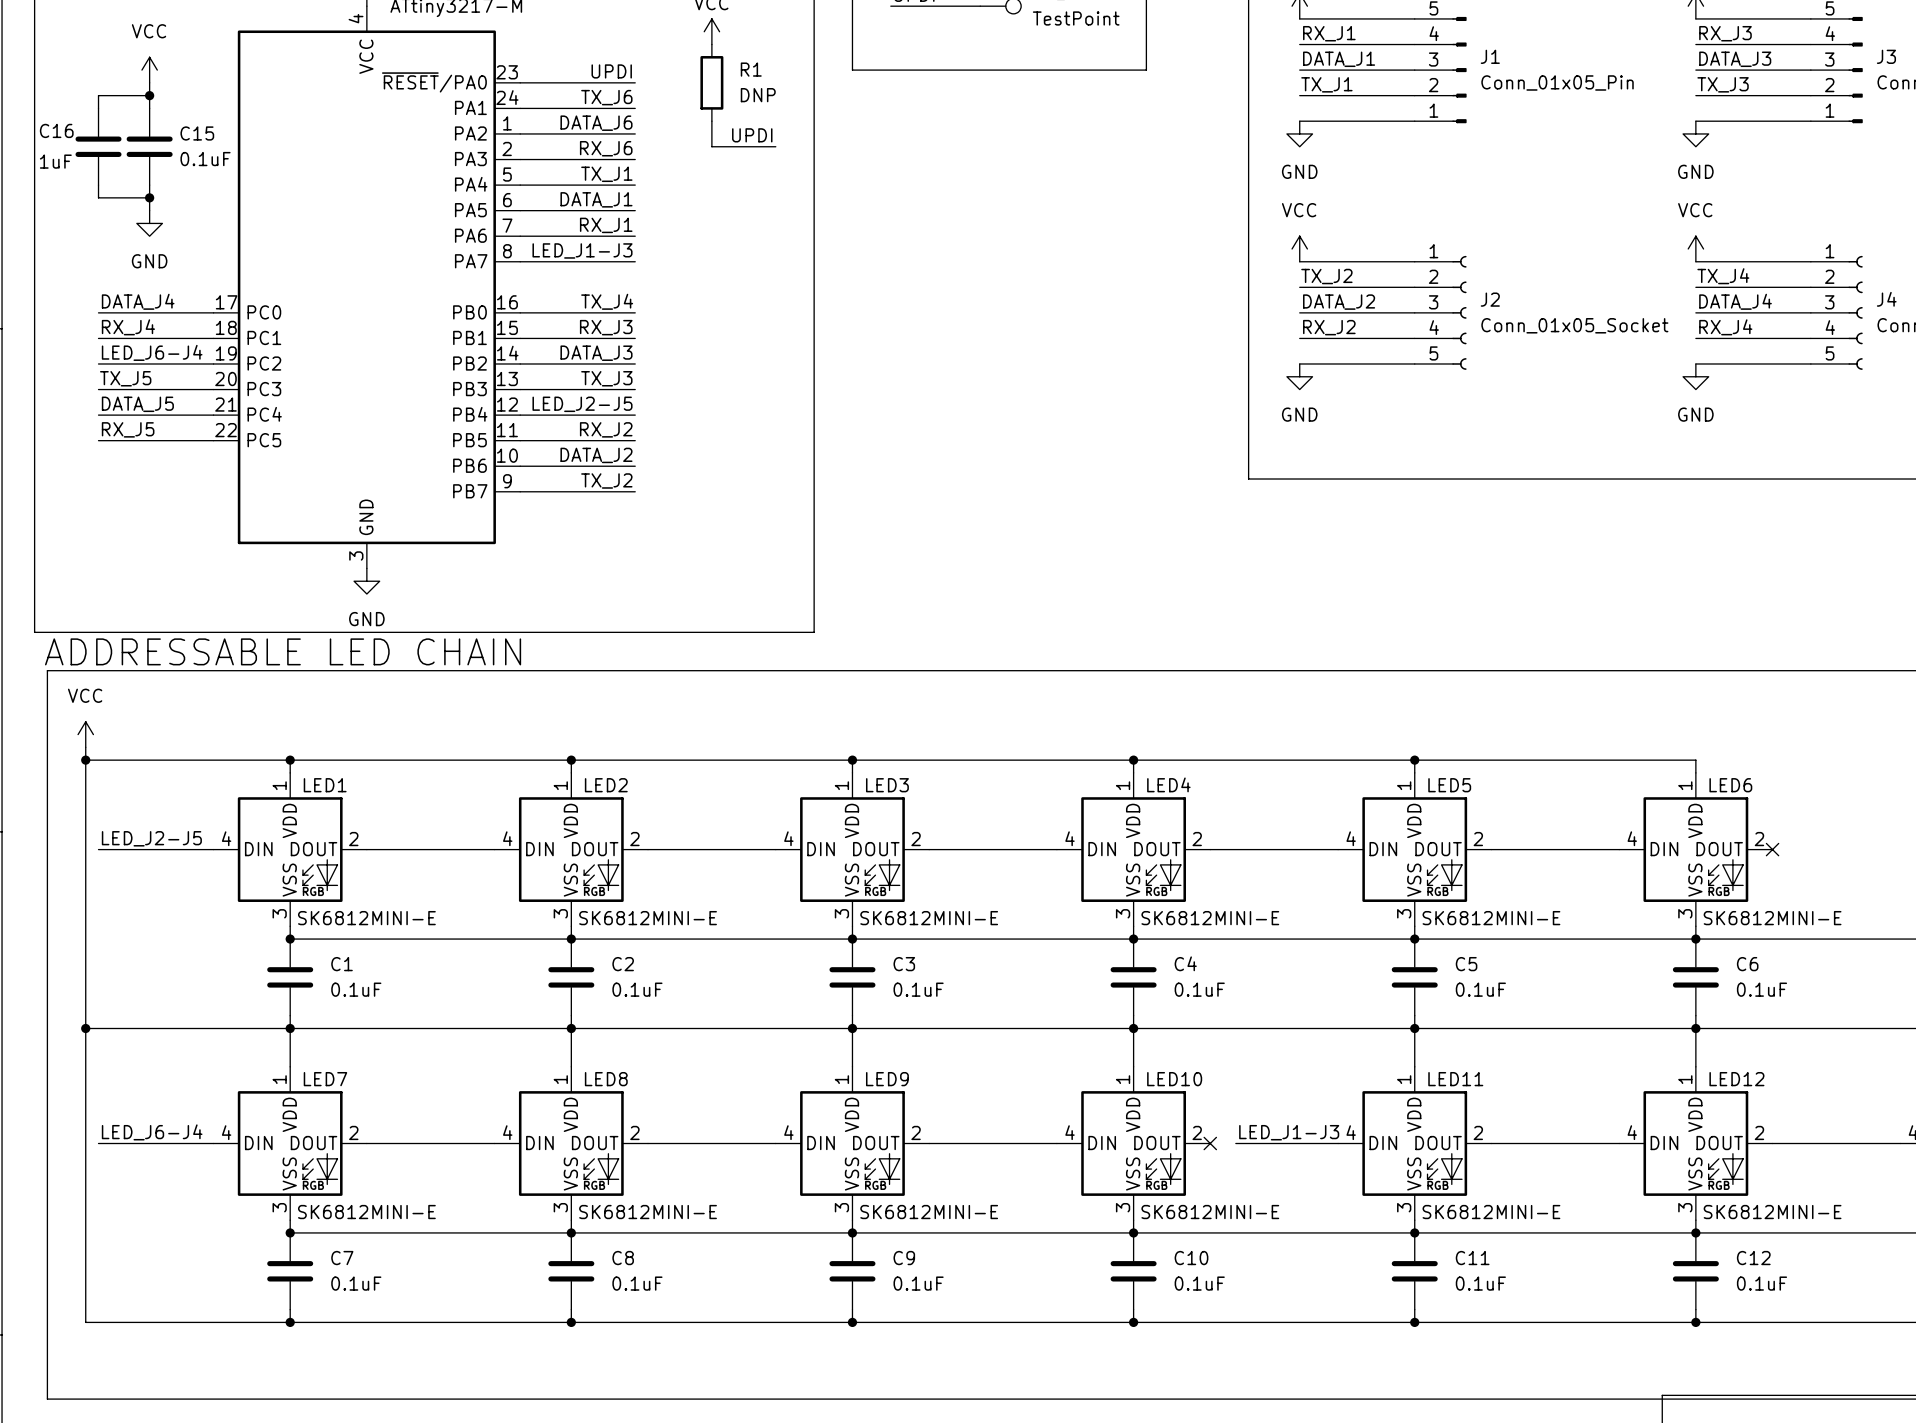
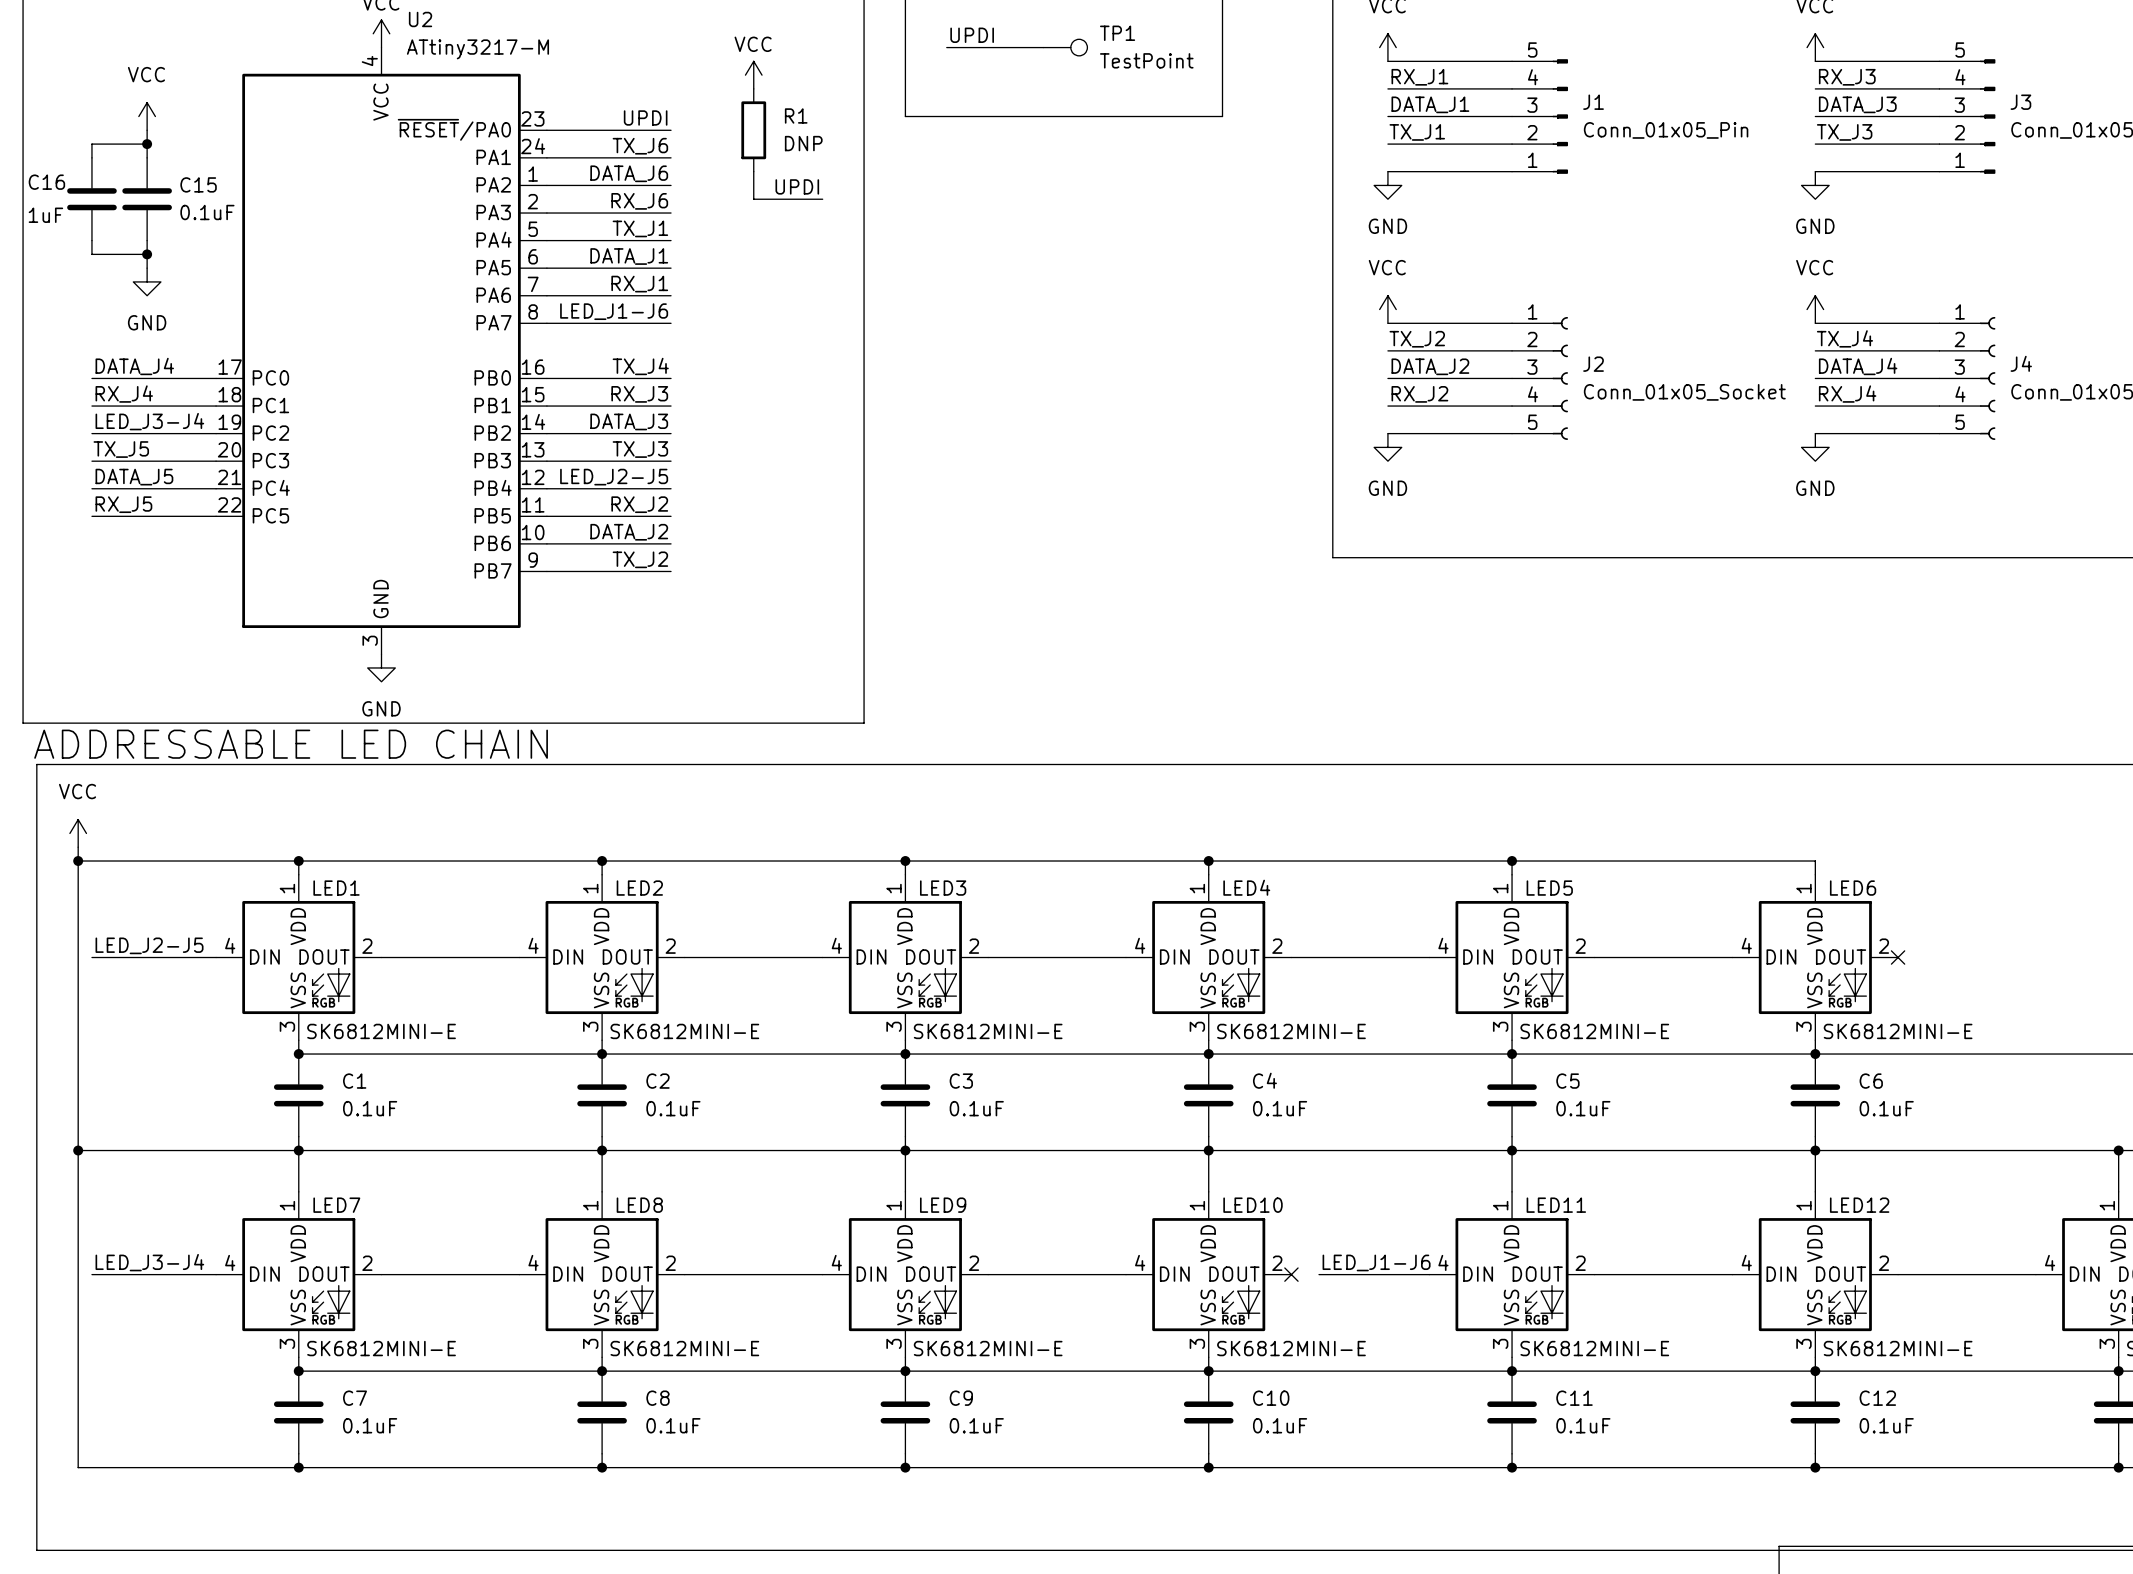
label: LED_J1-J3 (582, 250) -> LED_J1-J6 (614, 311)
label: LED_J6-J4 (152, 352) -> LED_J3-J4 (149, 421)
label: LED_J6-J4 (152, 1132) -> LED_J3-J4 (149, 1262)
label: LED_J1-J3 (1289, 1132) -> LED_J1-J6 (1376, 1262)

